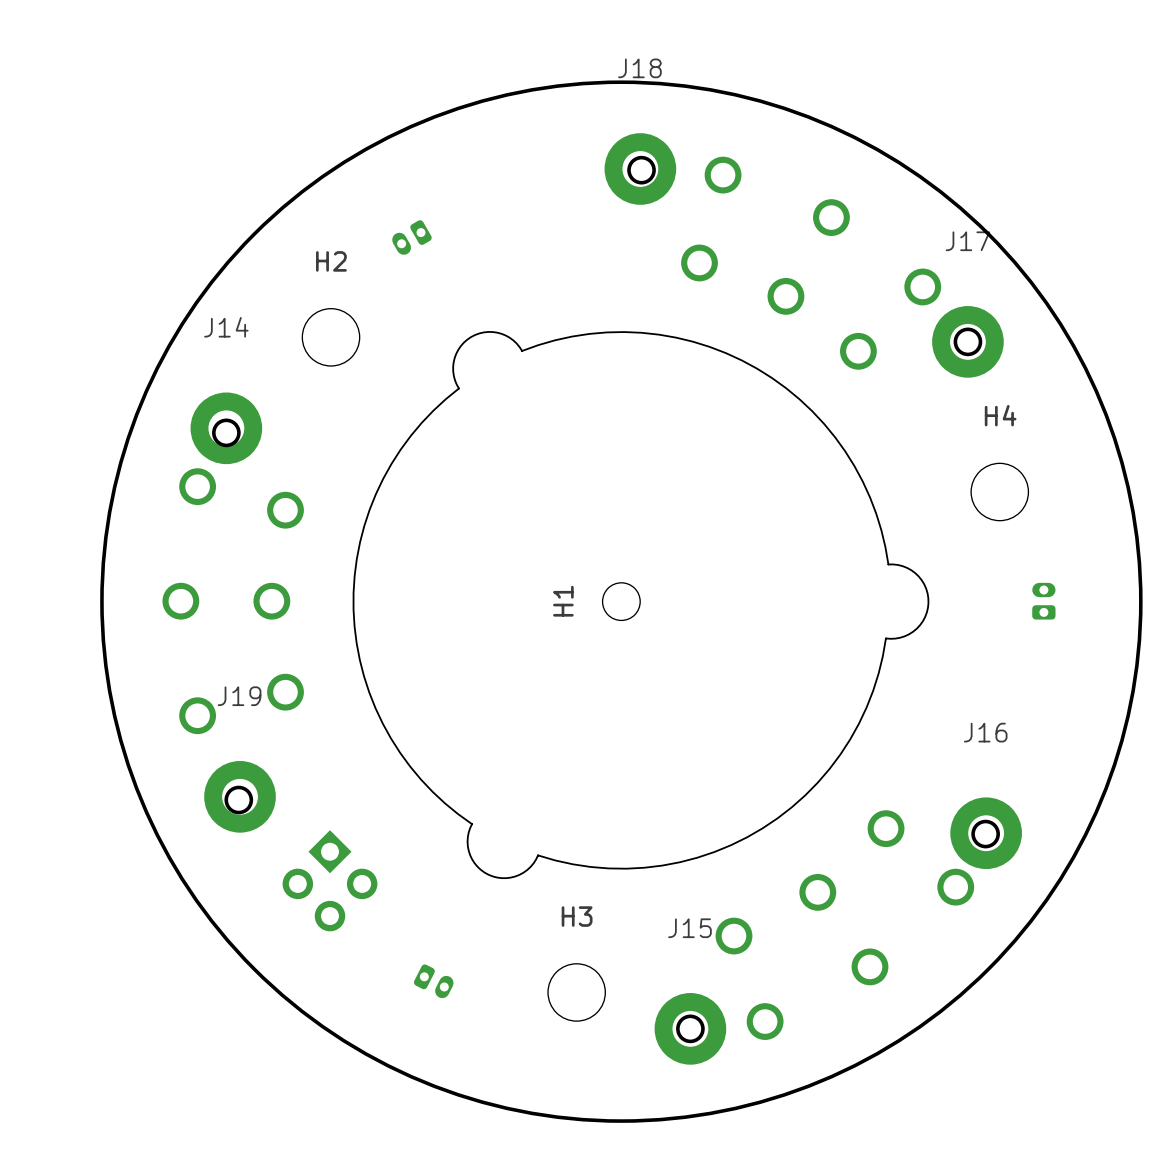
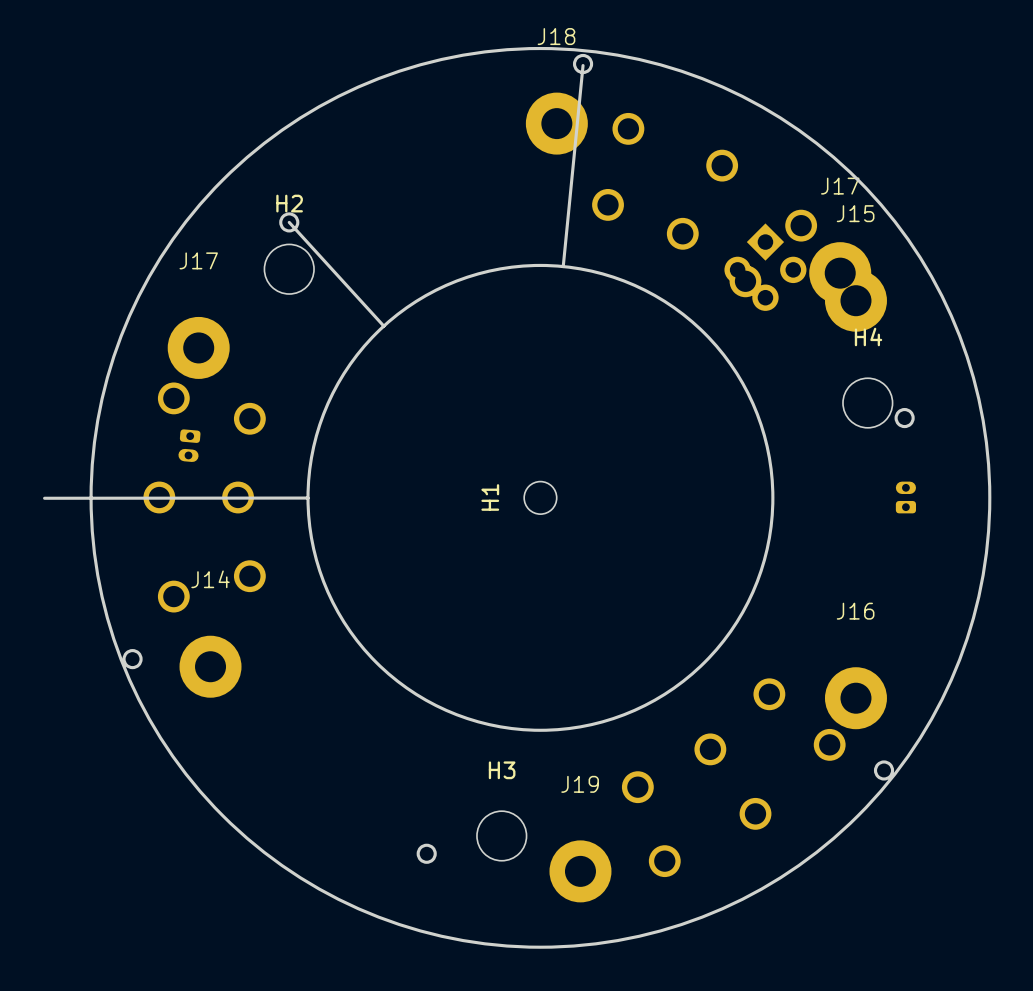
round board edge: none -> [572, 53, 594, 75]
board edge: none -> (583, 65) (563, 266)
round board edge: [627, 155, 656, 185] -> none
part: (411, 237) -> none
round board edge: none -> [279, 212, 300, 233]
board edge: none -> (289, 222) (383, 326)
J14 name: J14 (226, 327) -> J17 (198, 260)
round board edge: [953, 327, 983, 357] -> none
round board edge: none -> [306, 263, 775, 732]
part: none -> (765, 267)
board edge: (522, 350) (572, 336) (606, 332) (641, 332) (693, 341) (725, 353) (757, 368) (799, 399) (835, 437) (854, 466) (870, 497) (881, 530) (888, 564) (898, 564) (911, 570) (921, 580) (926, 588) (928, 602) (922, 621) (916, 628) (904, 636) (885, 638) (878, 673) (866, 707) (850, 739) (829, 768) (805, 795) (777, 818) (747, 837) (714, 852) (679, 862) (626, 868) (590, 866) (538, 855) (530, 866) (519, 874) (506, 878) (488, 874) (477, 866) (468, 850) (467, 837) (472, 824) (445, 803) (410, 766) (391, 738) (369, 692) (356, 643) (353, 592) (360, 542) (375, 494) (391, 463) (410, 436) (433, 410) (458, 388) (455, 380) (453, 366) (456, 353) (463, 342) (479, 333) (497, 332) (513, 340) (522, 350) -> none
round board edge: [212, 418, 241, 448] -> none
round board edge: none -> [894, 407, 915, 429]
part: none -> (189, 445)
board edge: none -> (308, 498) (44, 498)
J19 name: J19 (239, 696) -> J14 (210, 579)
round board edge: none -> [122, 649, 143, 670]
round board edge: [224, 785, 254, 815] -> none
round board edge: [971, 819, 1000, 849] -> none
part: (330, 880) -> none
round board edge: none -> [873, 760, 895, 781]
part: (433, 981) -> none
round board edge: none -> [416, 843, 437, 864]
round board edge: [676, 1014, 705, 1044] -> none
J15 position: (690, 1028) -> (855, 300)
J19: none -> (580, 871)

